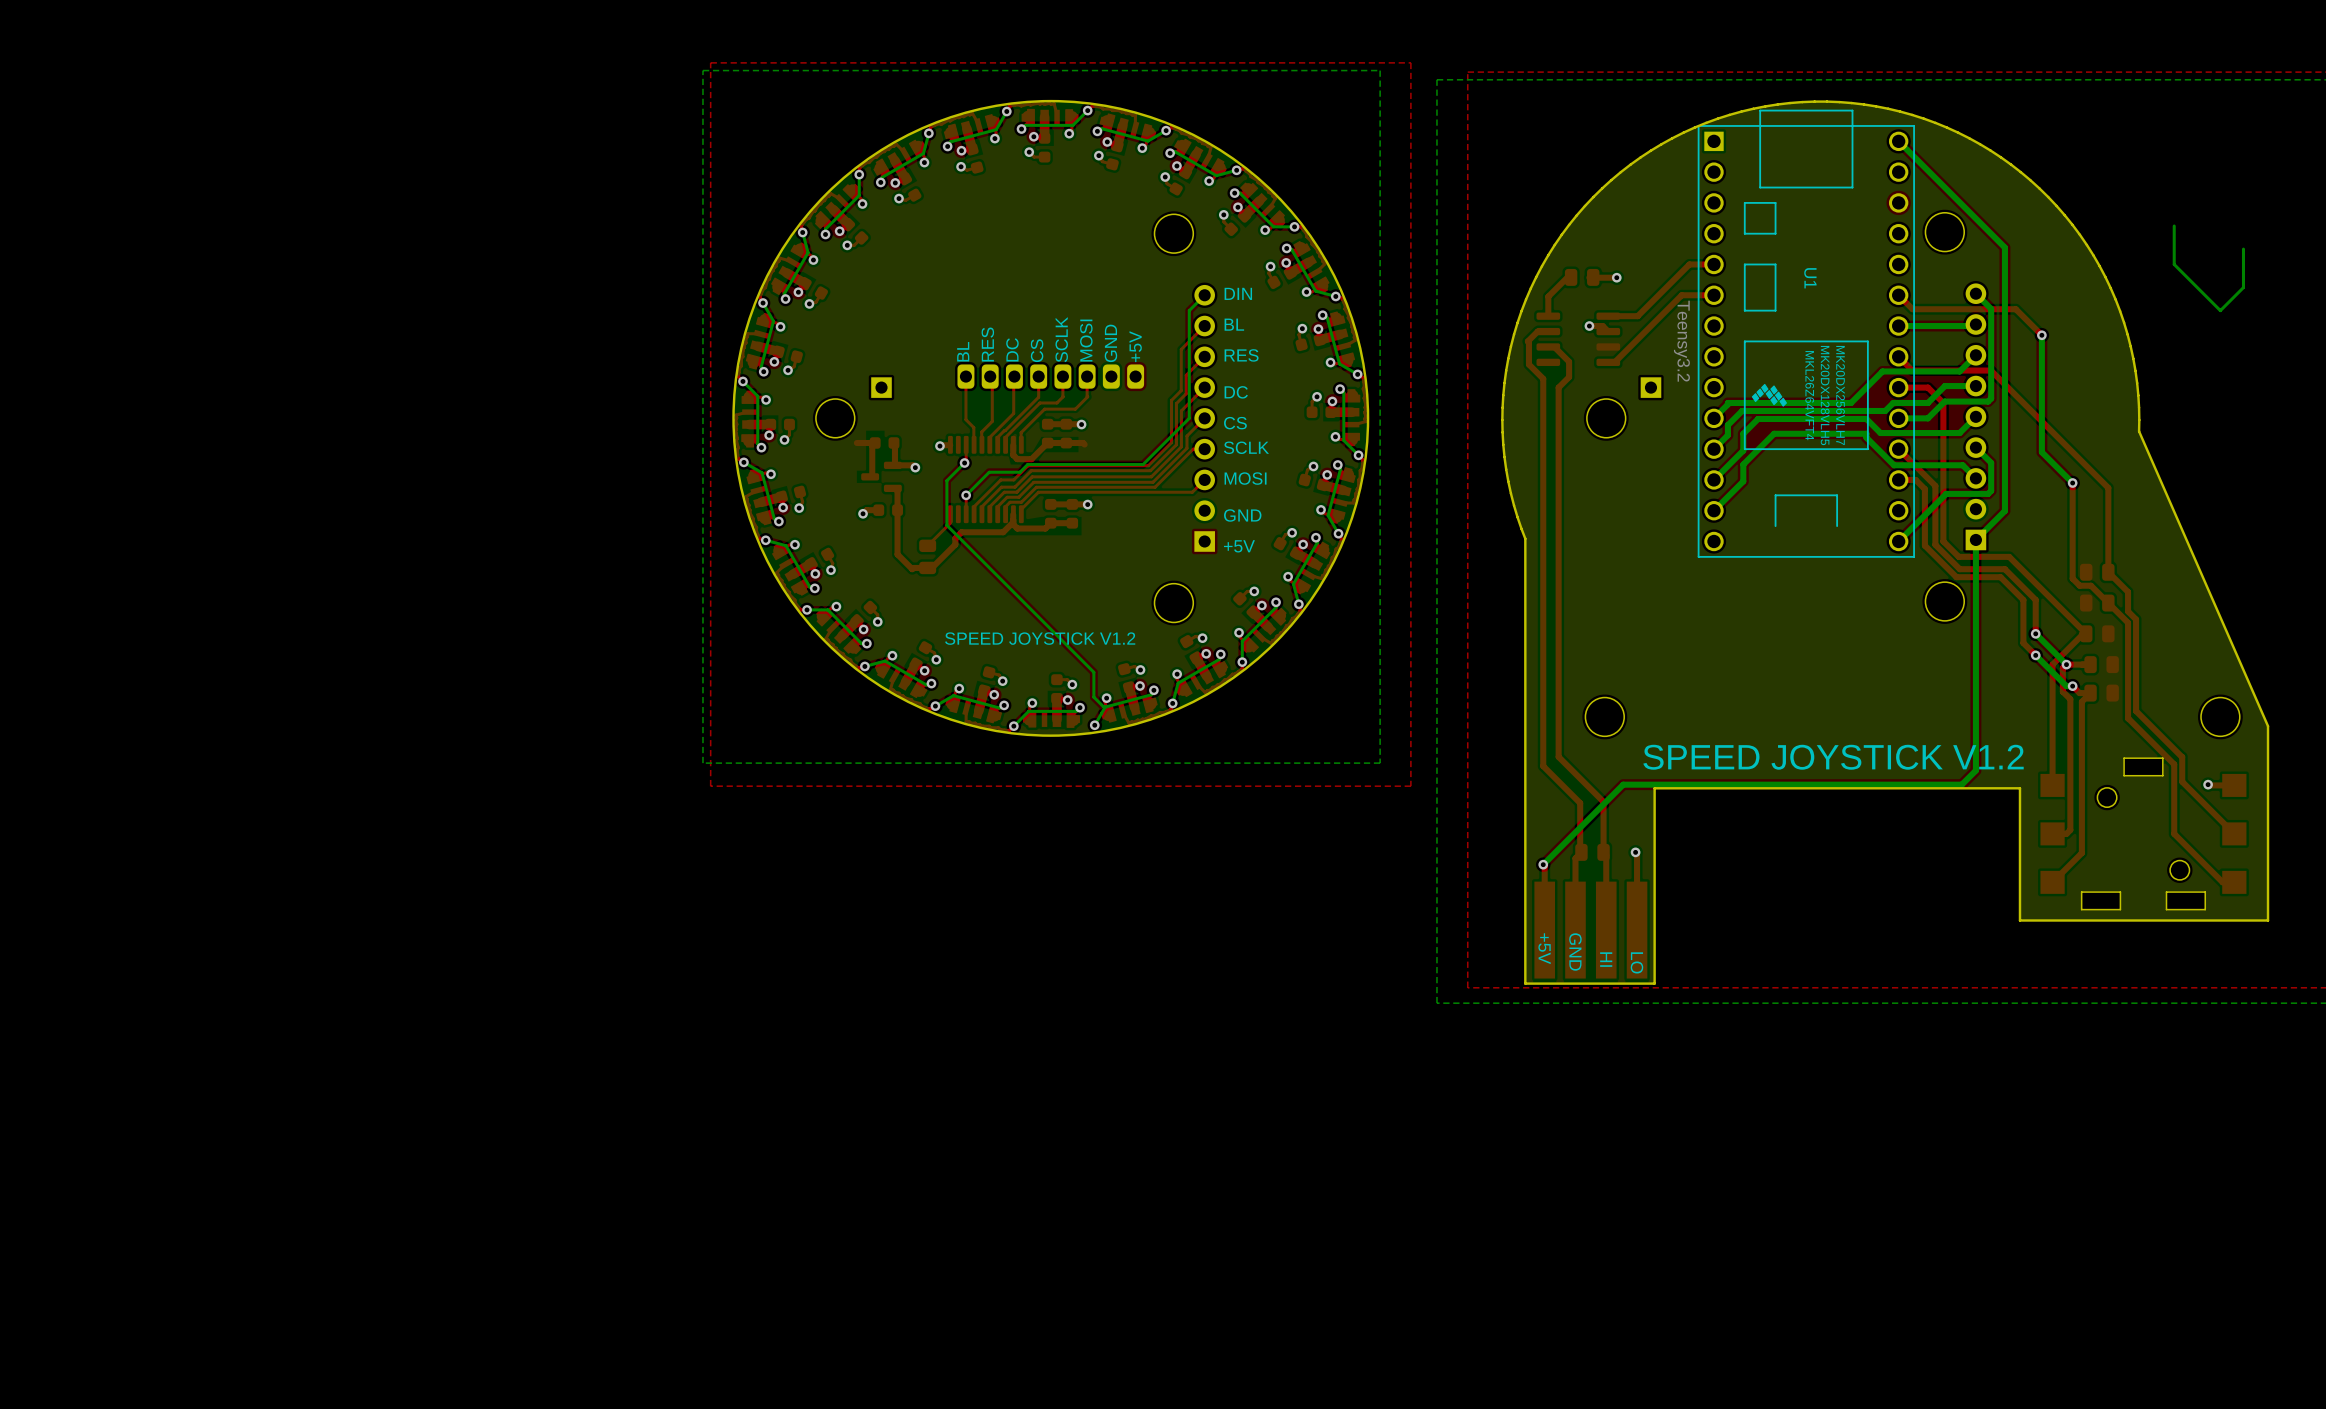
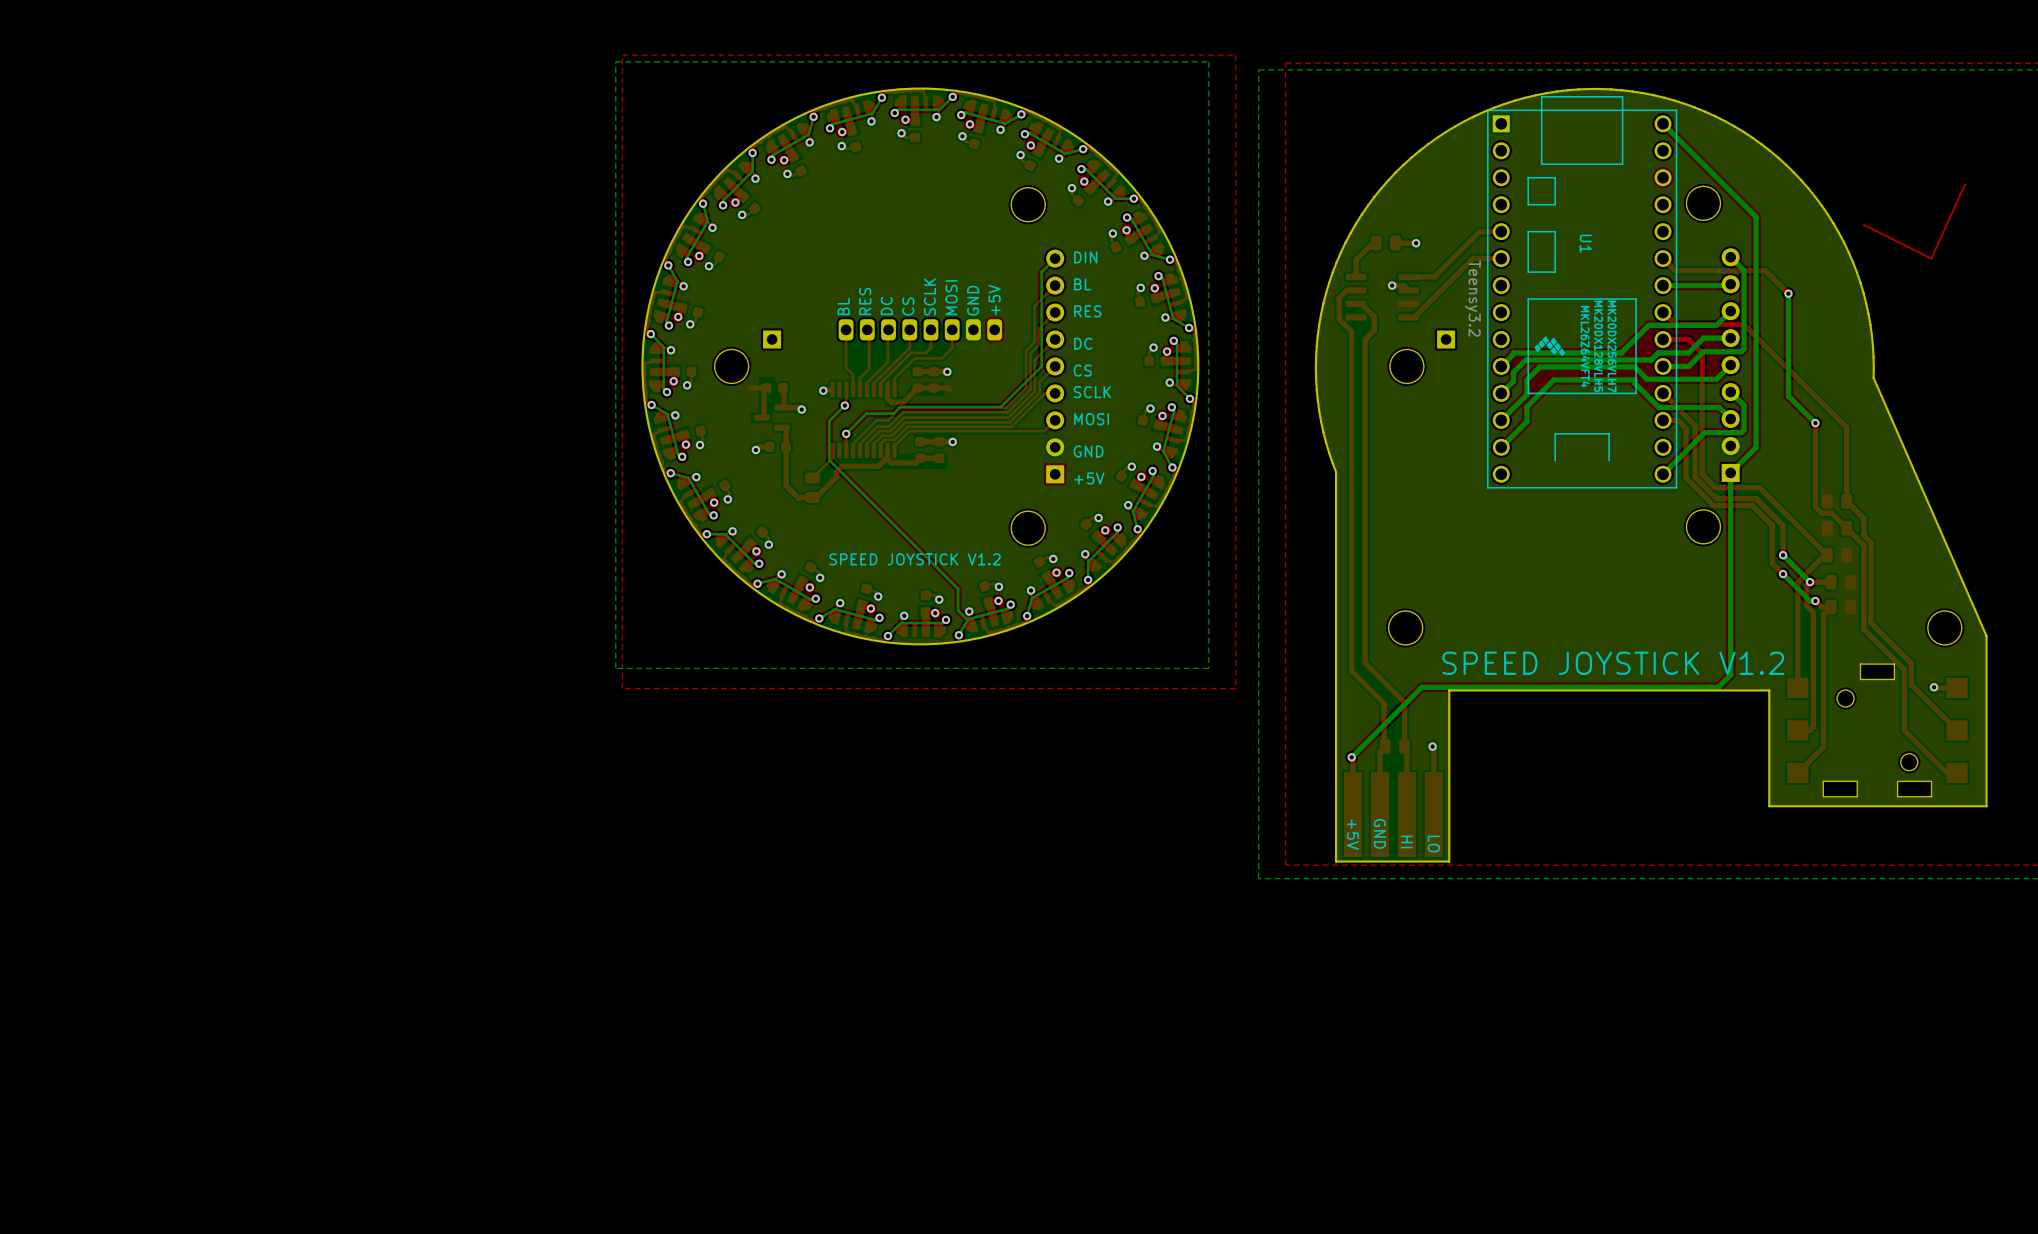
top track: none -> (1965, 184) (1931, 258) (1863, 224)
bottom track: (2174, 226) (2174, 264) (2220, 310) (2243, 287) (2243, 249) -> none

